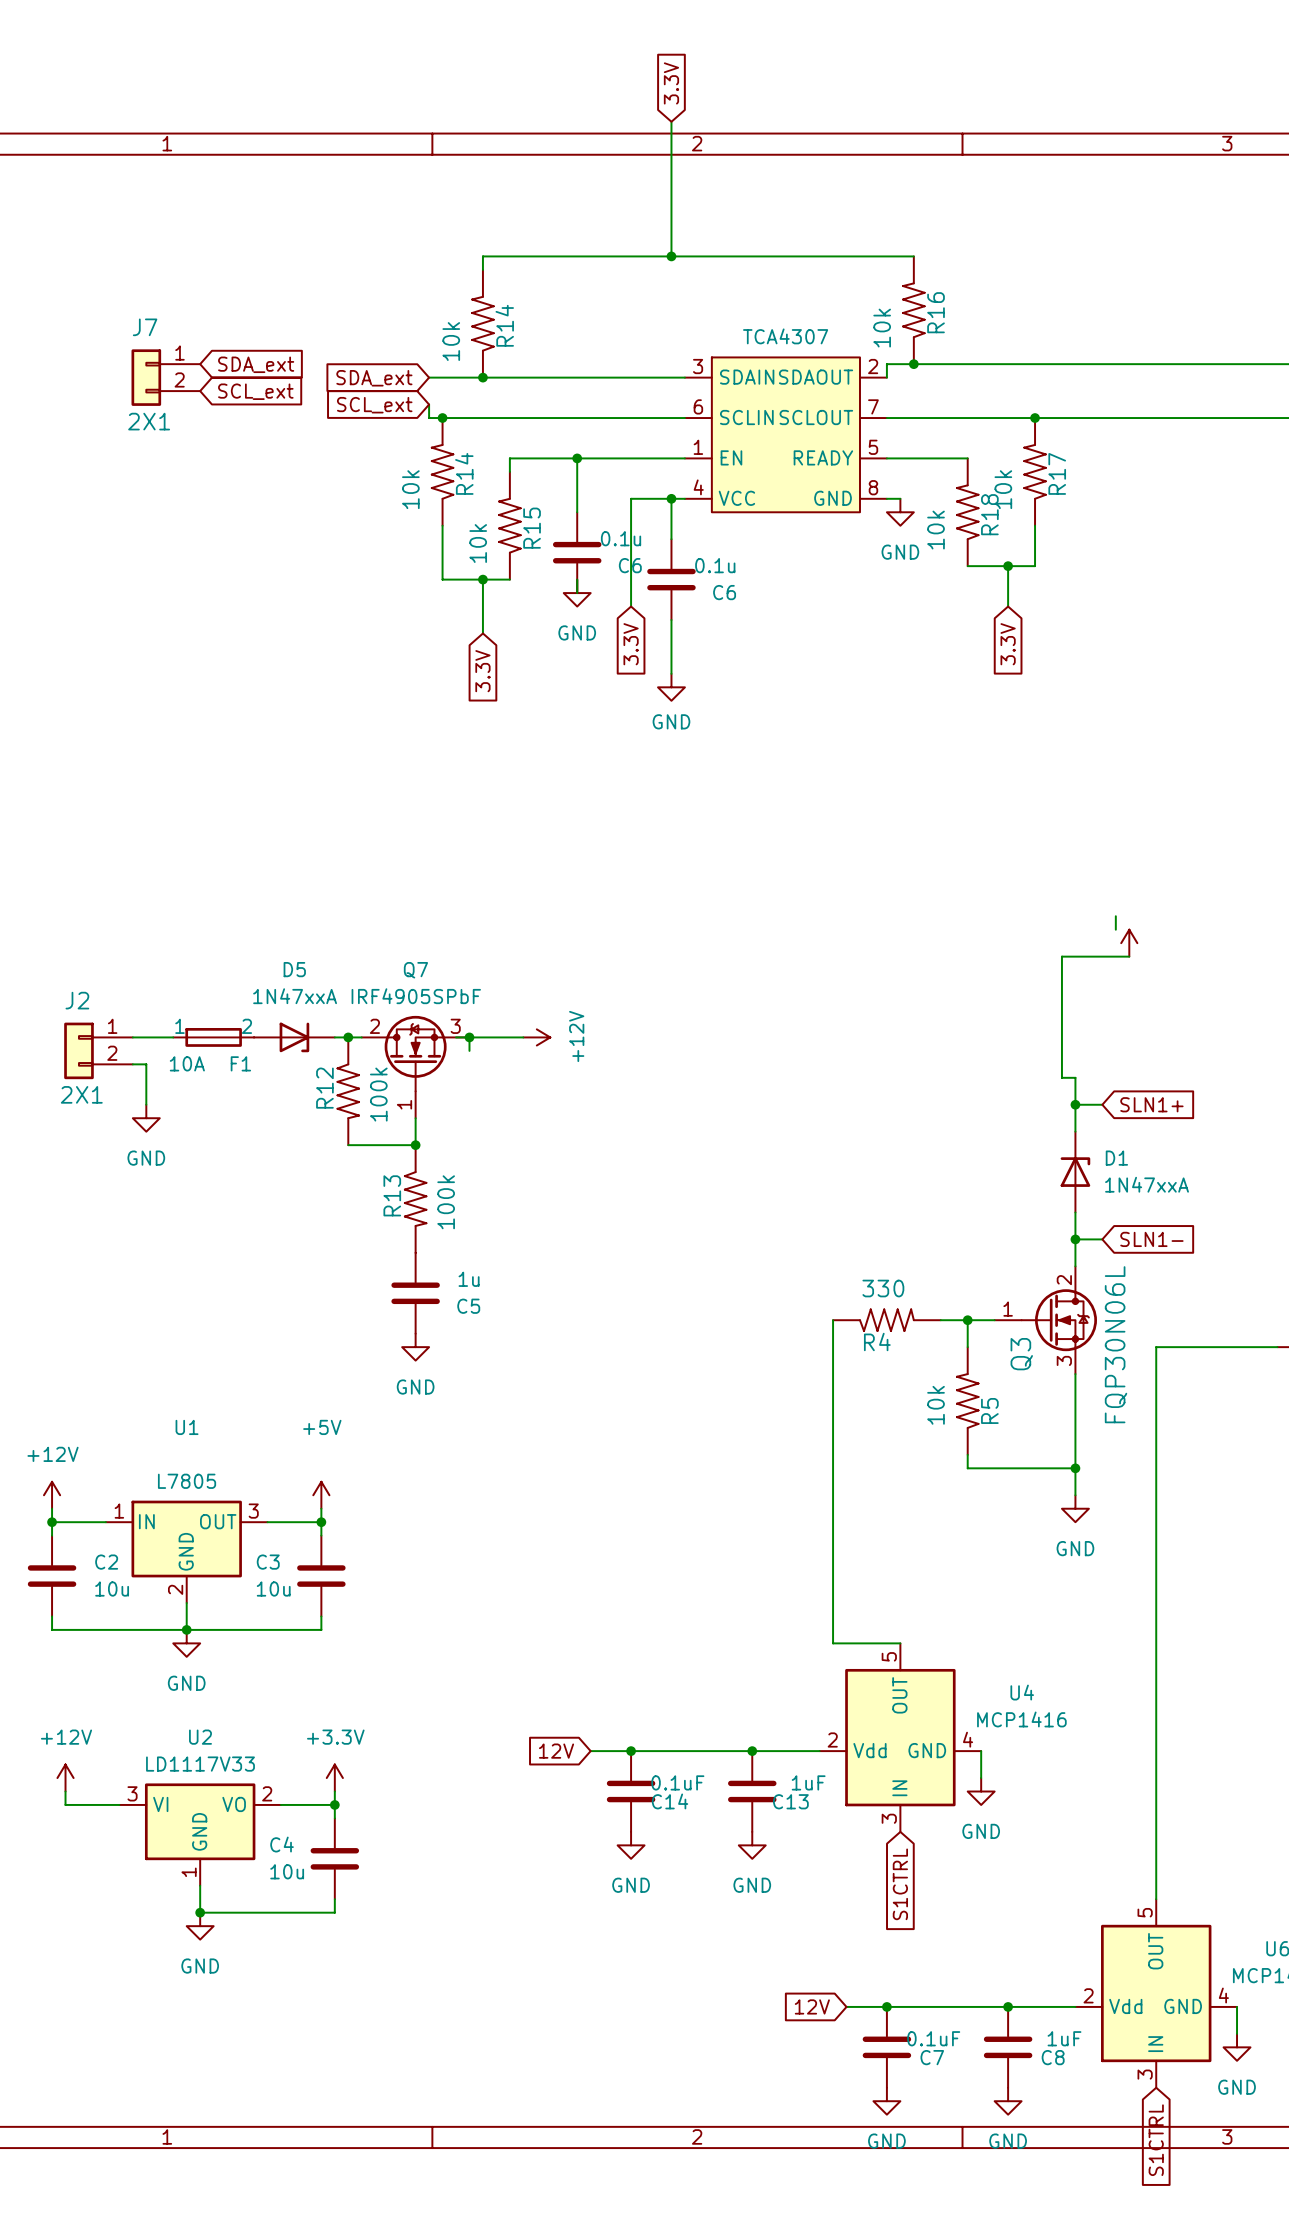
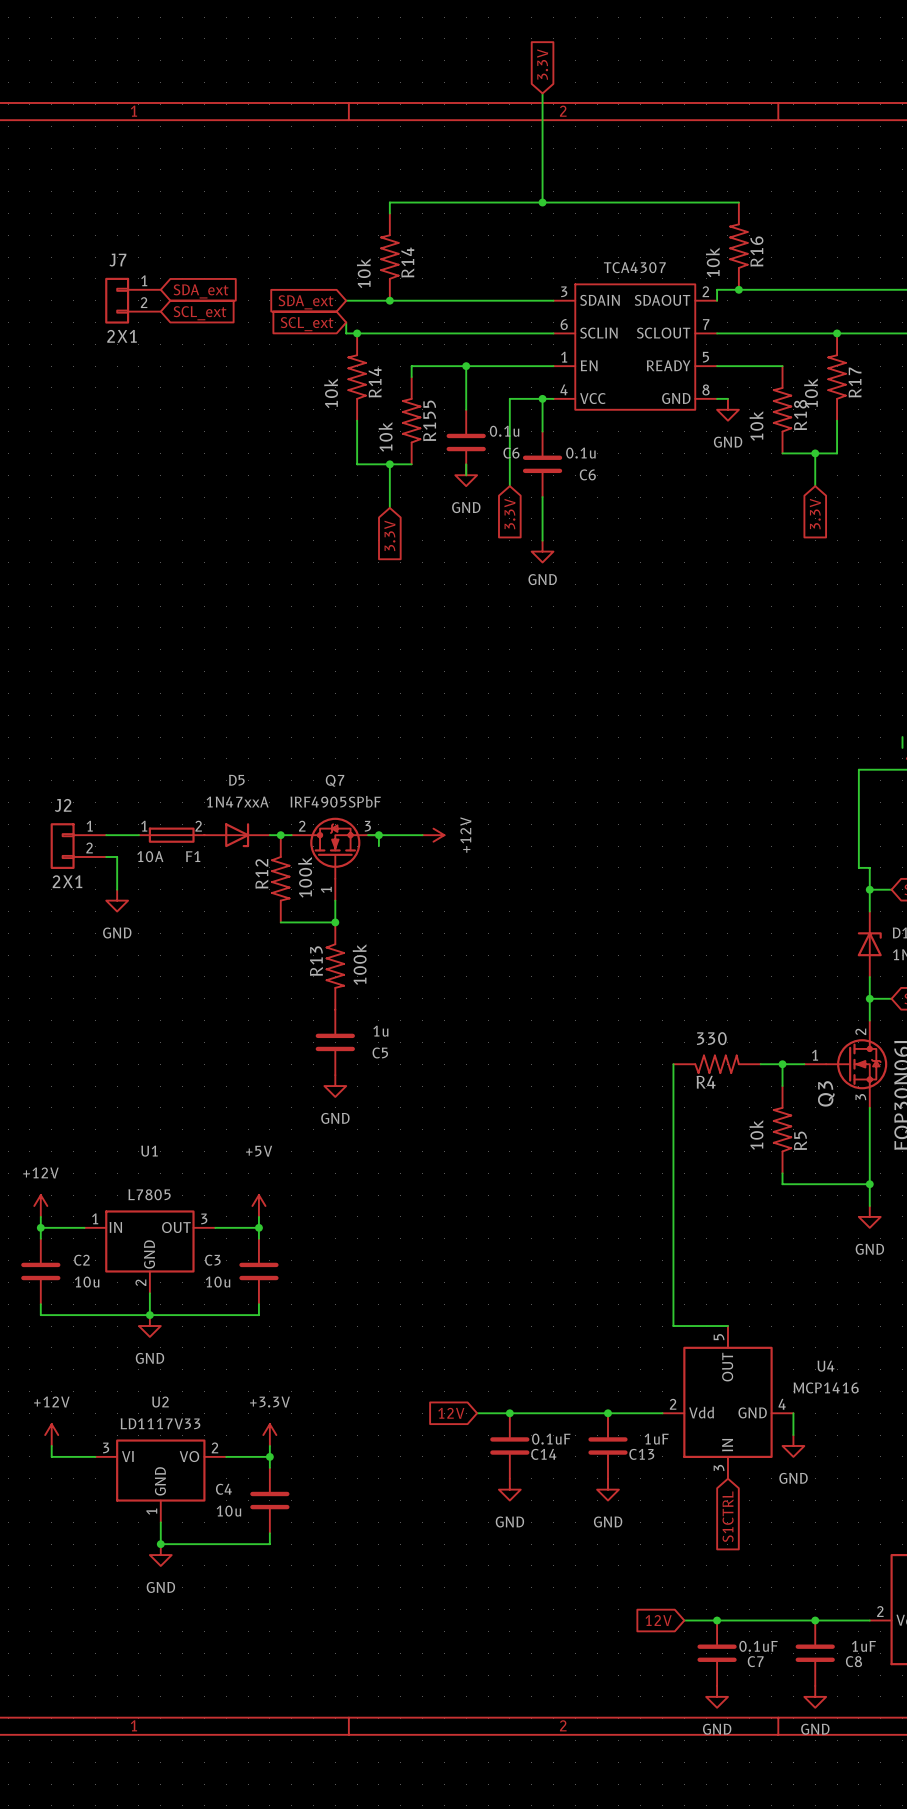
R15 name: R15 (532, 528) -> R155 (429, 420)

